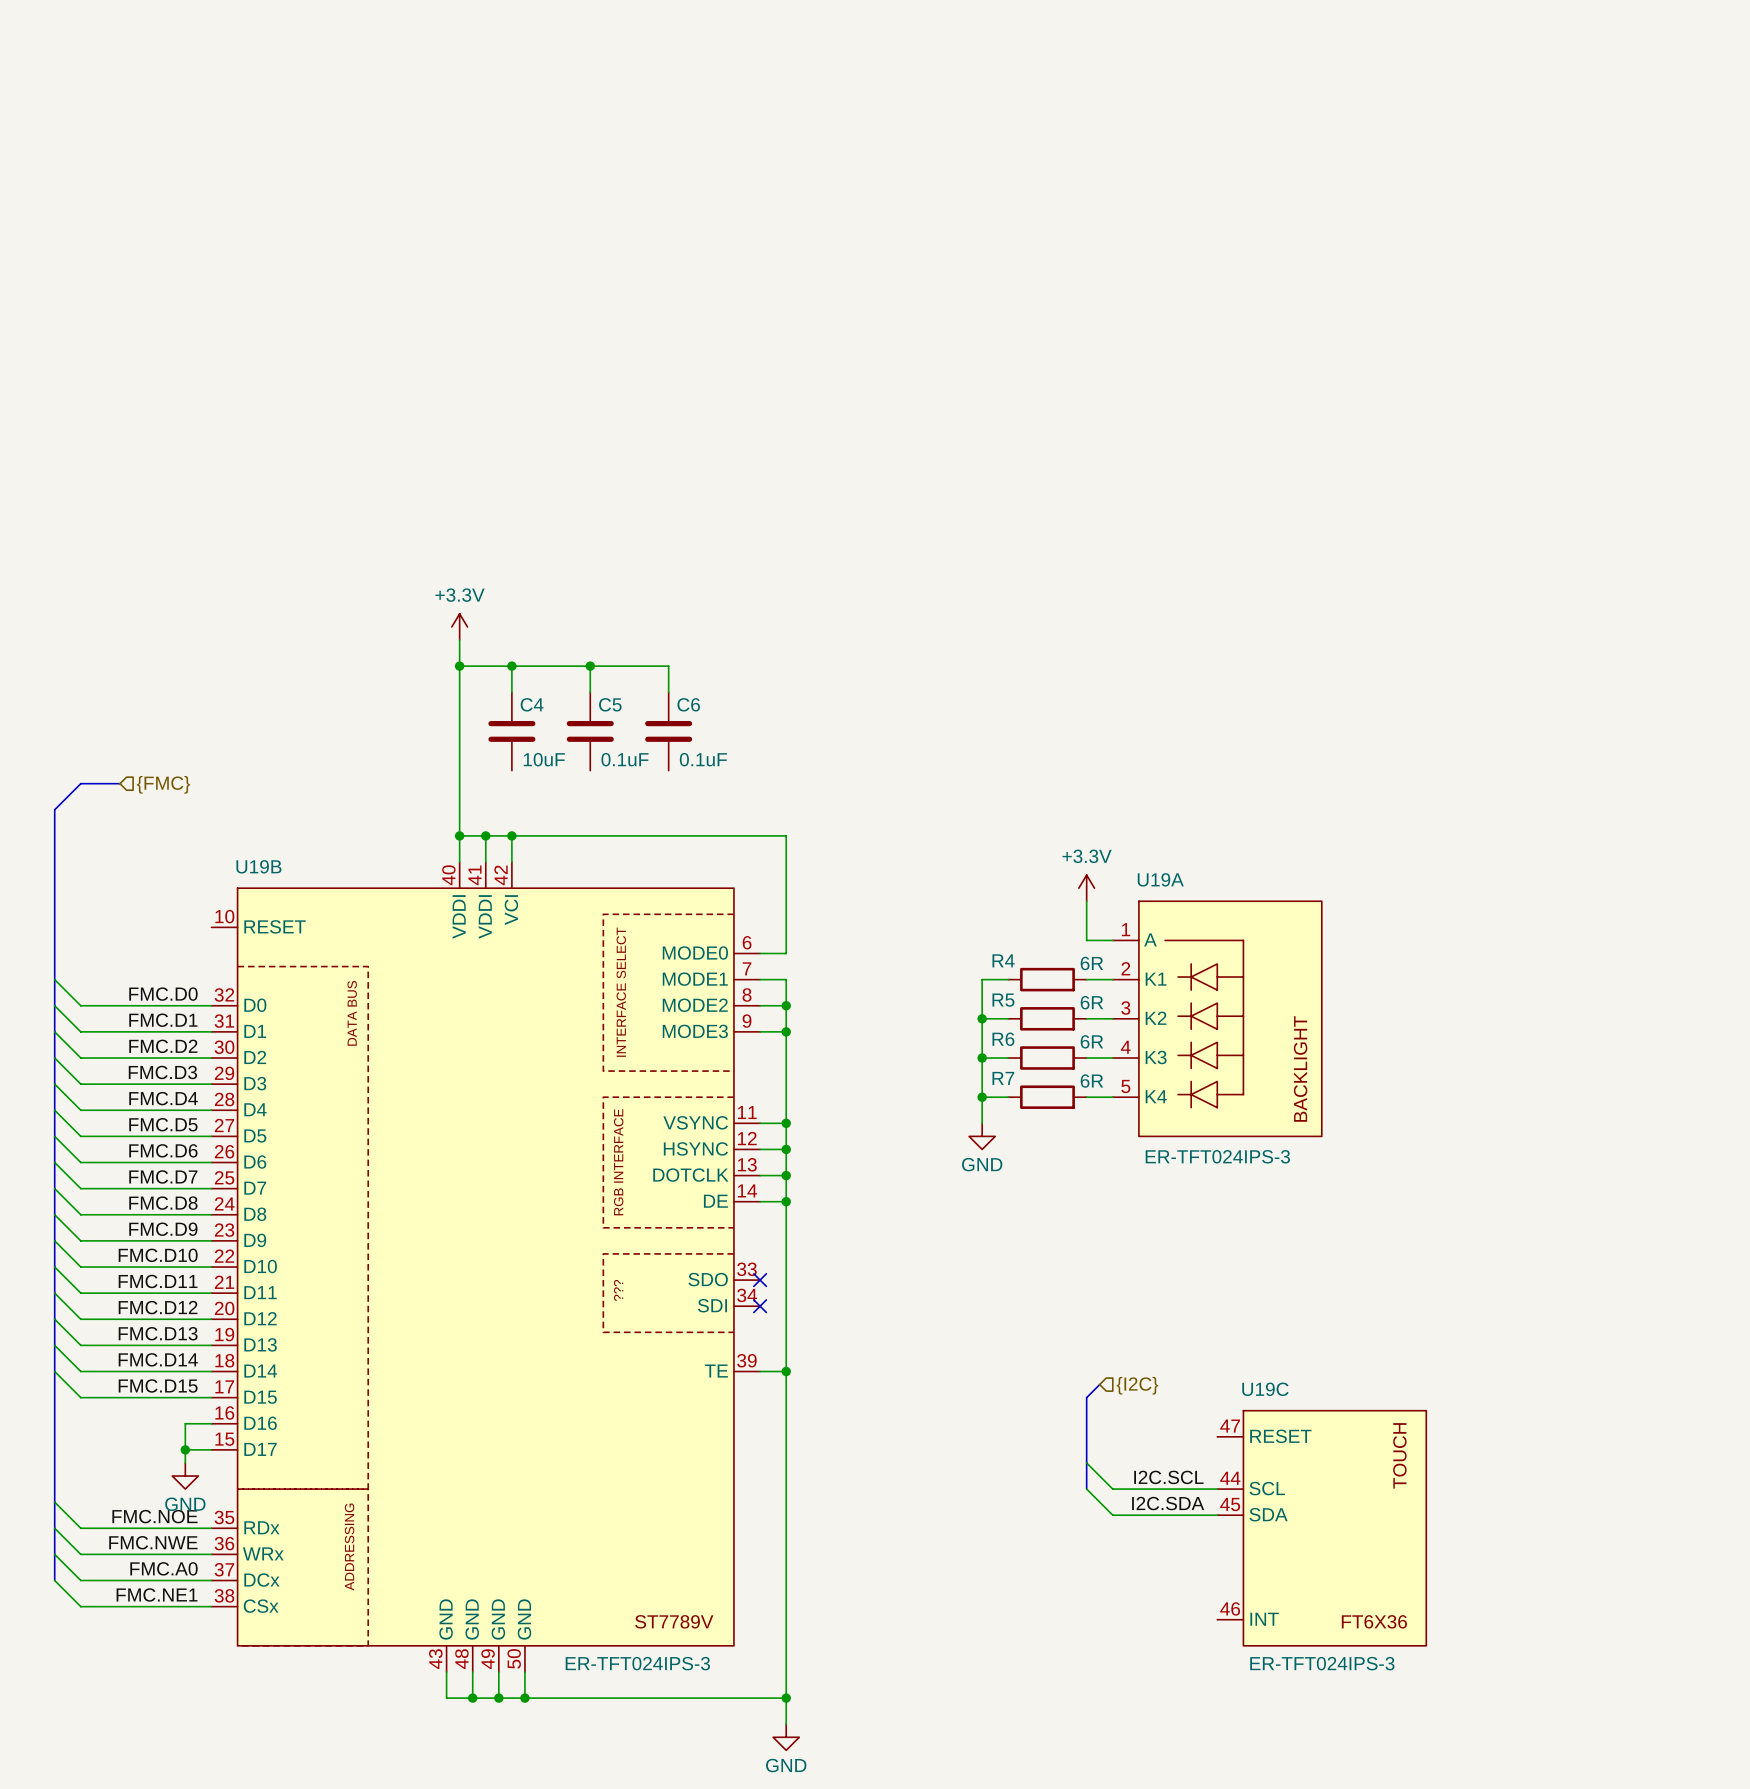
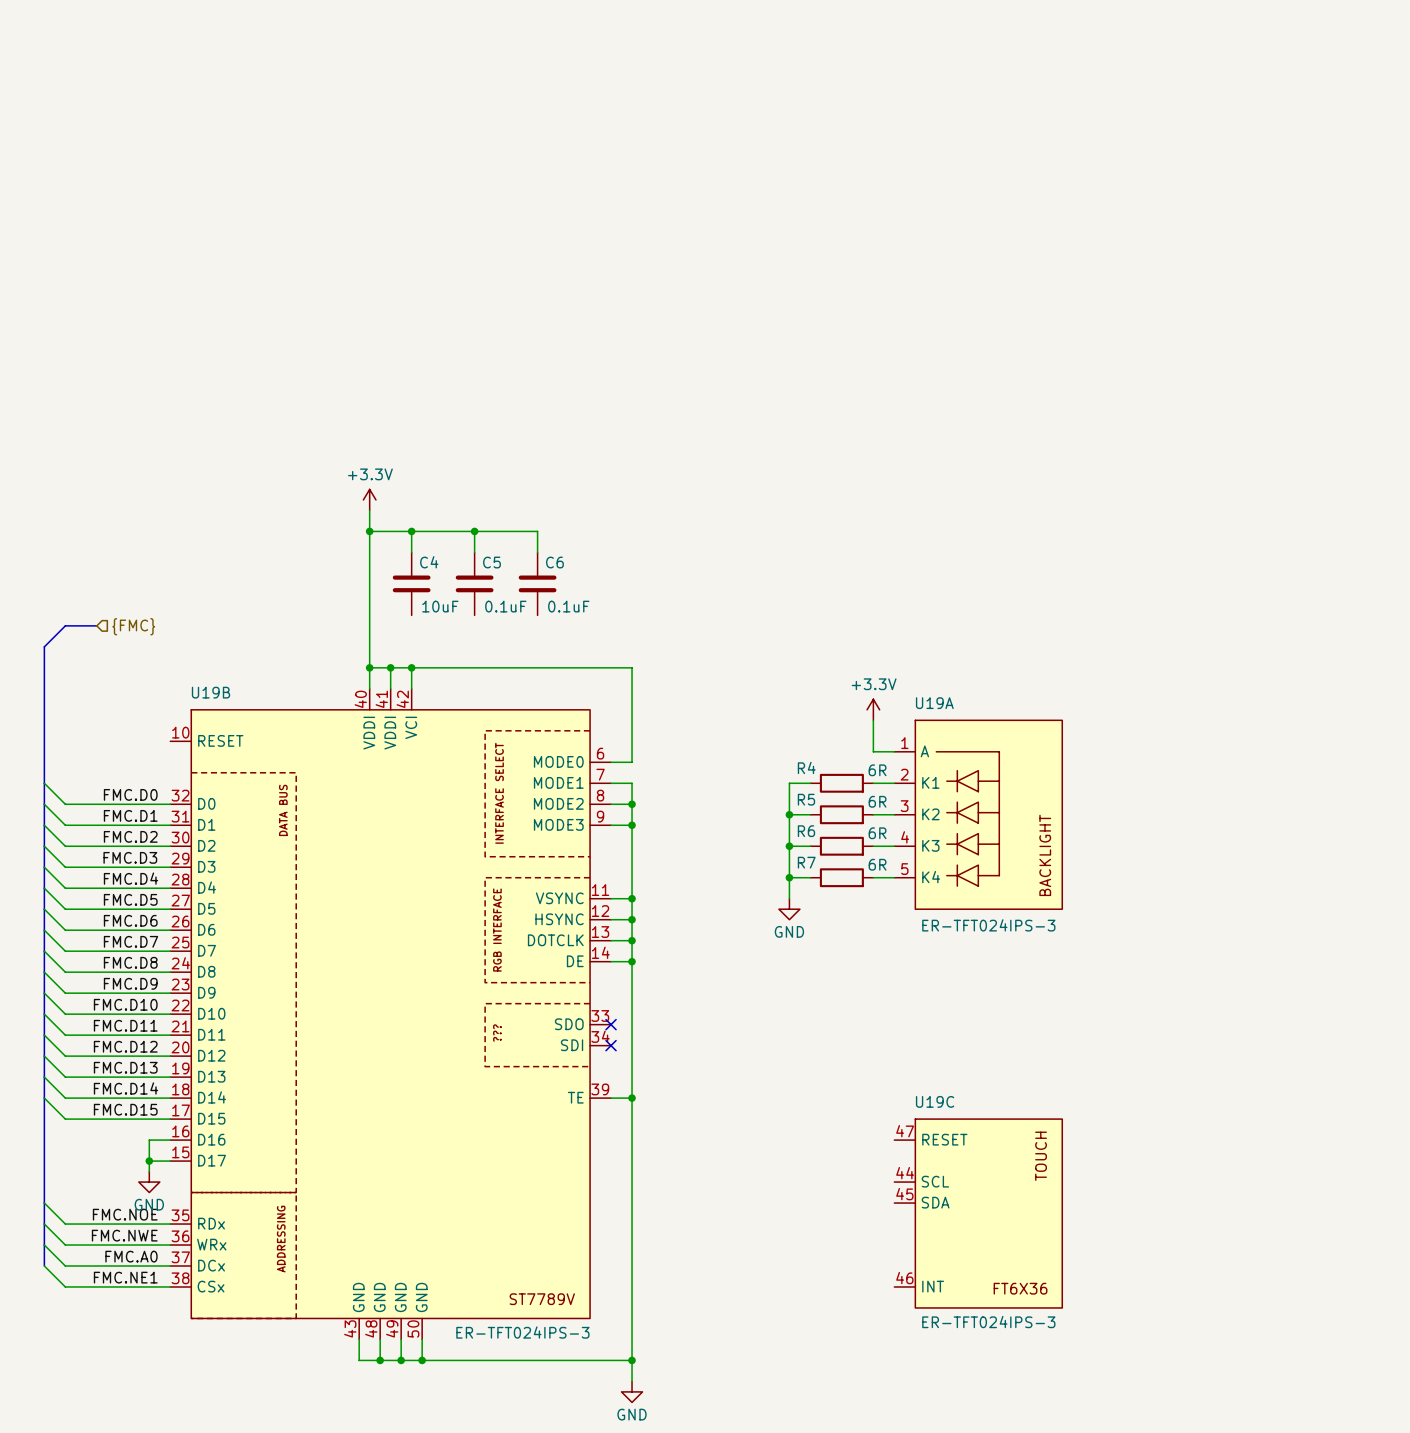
bus: (1099, 1384) (1086, 1397) (1086, 1489) -> none
hierarchical label: {I2C} (1137, 1385) -> none
wire: (1086, 1462) (1112, 1489) (1217, 1489) -> none
label: I2C.SCL (1168, 1477) -> none
wire: (1086, 1489) (1112, 1515) (1217, 1515) -> none
label: I2C.SDA (1168, 1503) -> none
U19C position: (1321, 1528) -> (978, 1213)

